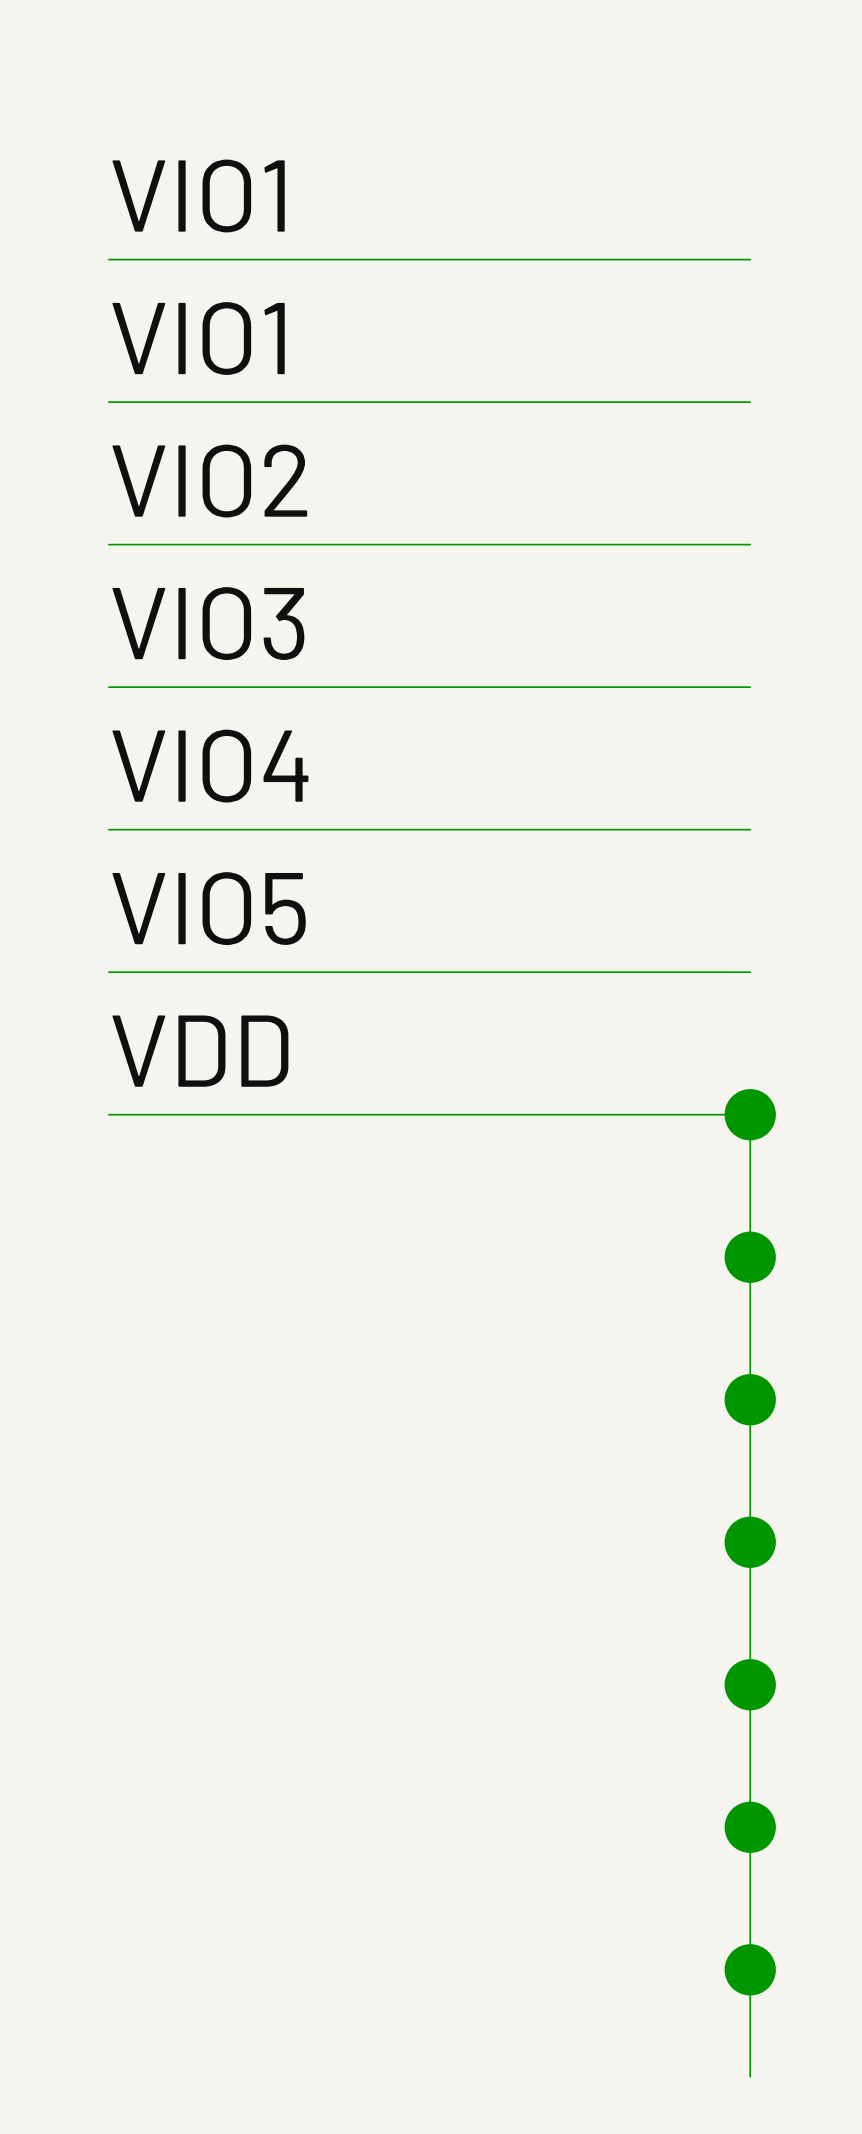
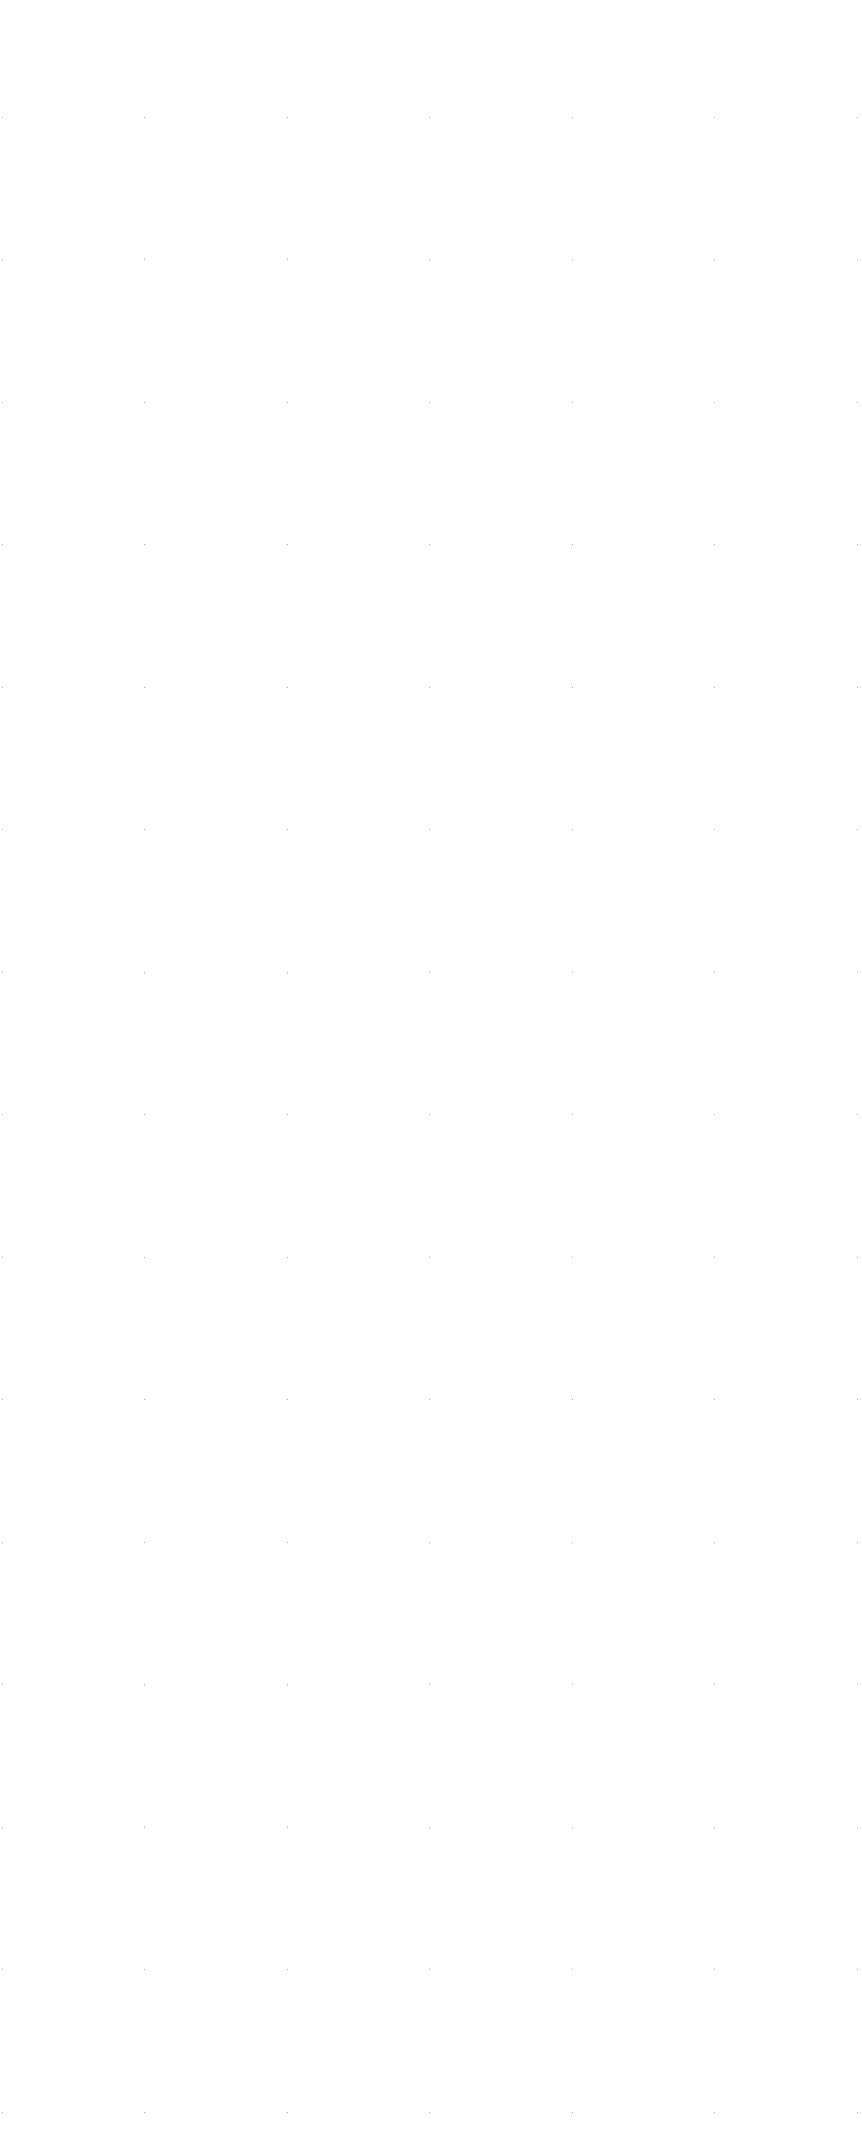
label: VIO1 (198, 196) -> none
wire: (108, 259) (750, 259) -> none
label: VIO1 (198, 338) -> none
wire: (108, 402) (750, 402) -> none
label: VIO2 (209, 481) -> none
wire: (108, 544) (750, 544) -> none
label: VIO3 (208, 623) -> none
wire: (108, 687) (750, 687) -> none
label: VIO4 (210, 766) -> none
wire: (108, 829) (750, 829) -> none
label: VIO5 (209, 908) -> none
wire: (108, 972) (750, 972) -> none
label: VDD (200, 1051) -> none
wire: (108, 1114) (750, 1114) (750, 2076) -> none
junction: (750, 1114) -> none
junction: (750, 1257) -> none
junction: (750, 1399) -> none
junction: (750, 1542) -> none
junction: (750, 1684) -> none
junction: (750, 1827) -> none
junction: (750, 1969) -> none

